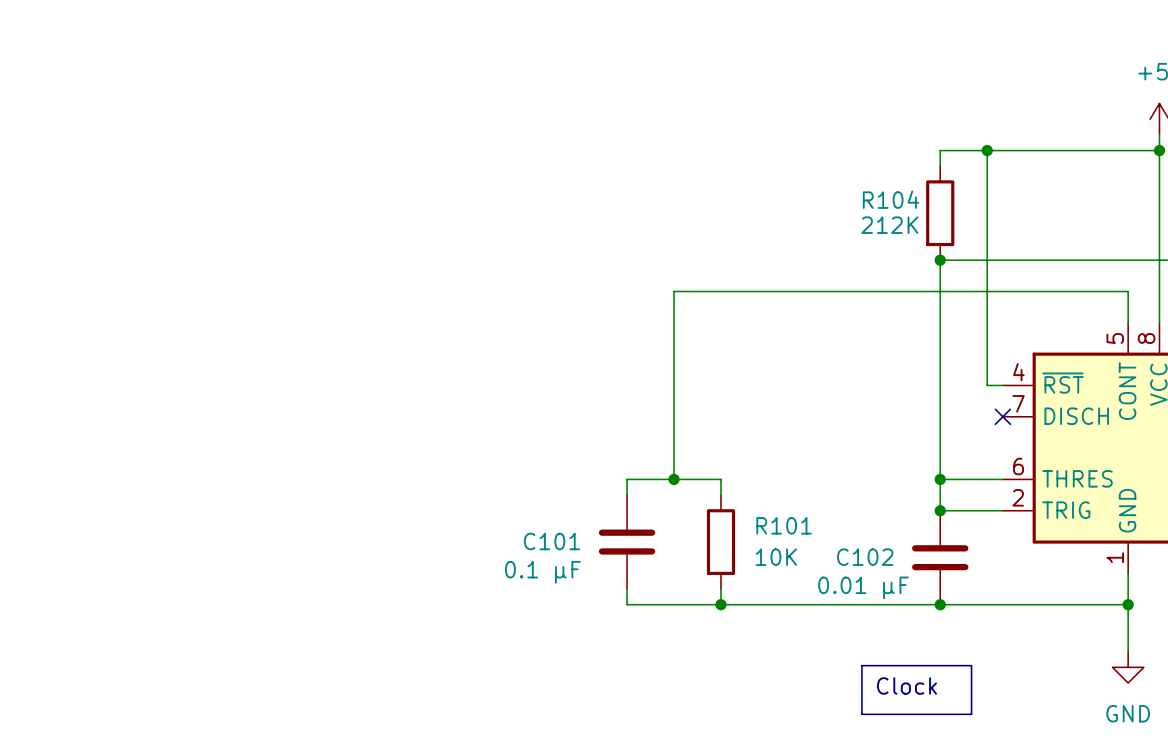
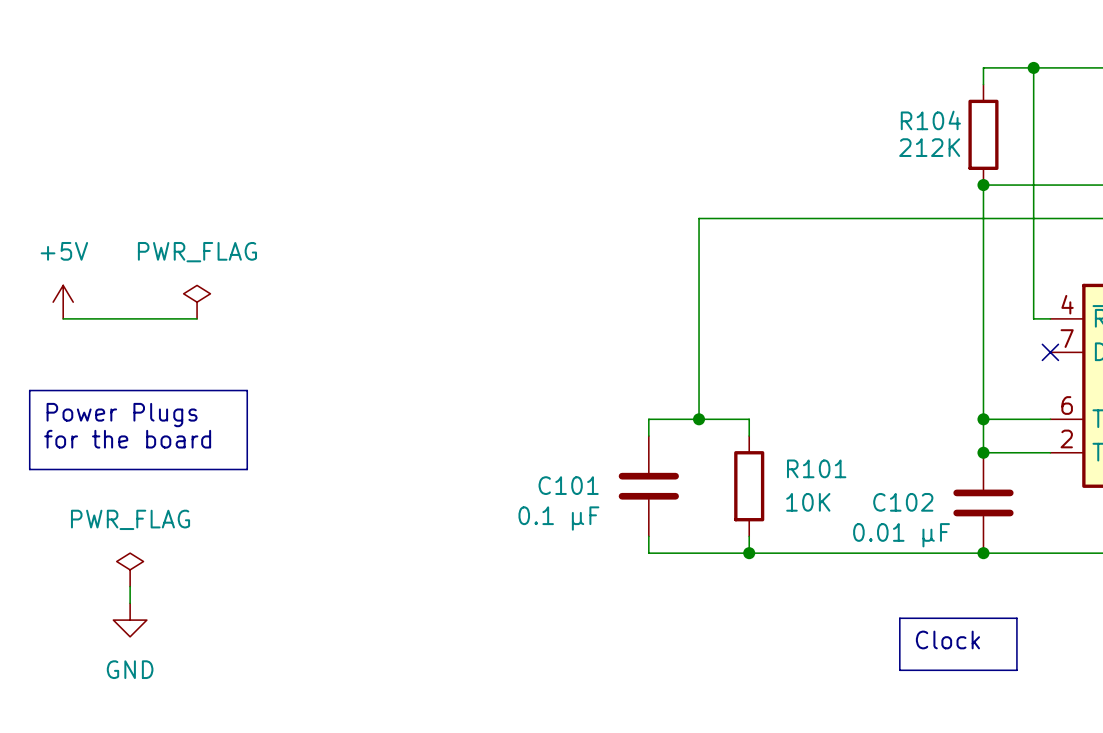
power symbol: none -> +5V (63, 302)
power symbol: none -> PWR_FLAG (197, 302)
wire: none -> (63, 318) (197, 318)
line: none -> (29, 390) (247, 390) (247, 469) (29, 469) (29, 390)
text: none -> Power Plugs (122, 415)
text: none -> for the board (127, 439)
power symbol: none -> PWR_FLAG (130, 569)
wire: none -> (130, 586) (130, 603)
power symbol: none -> GND (130, 620)

